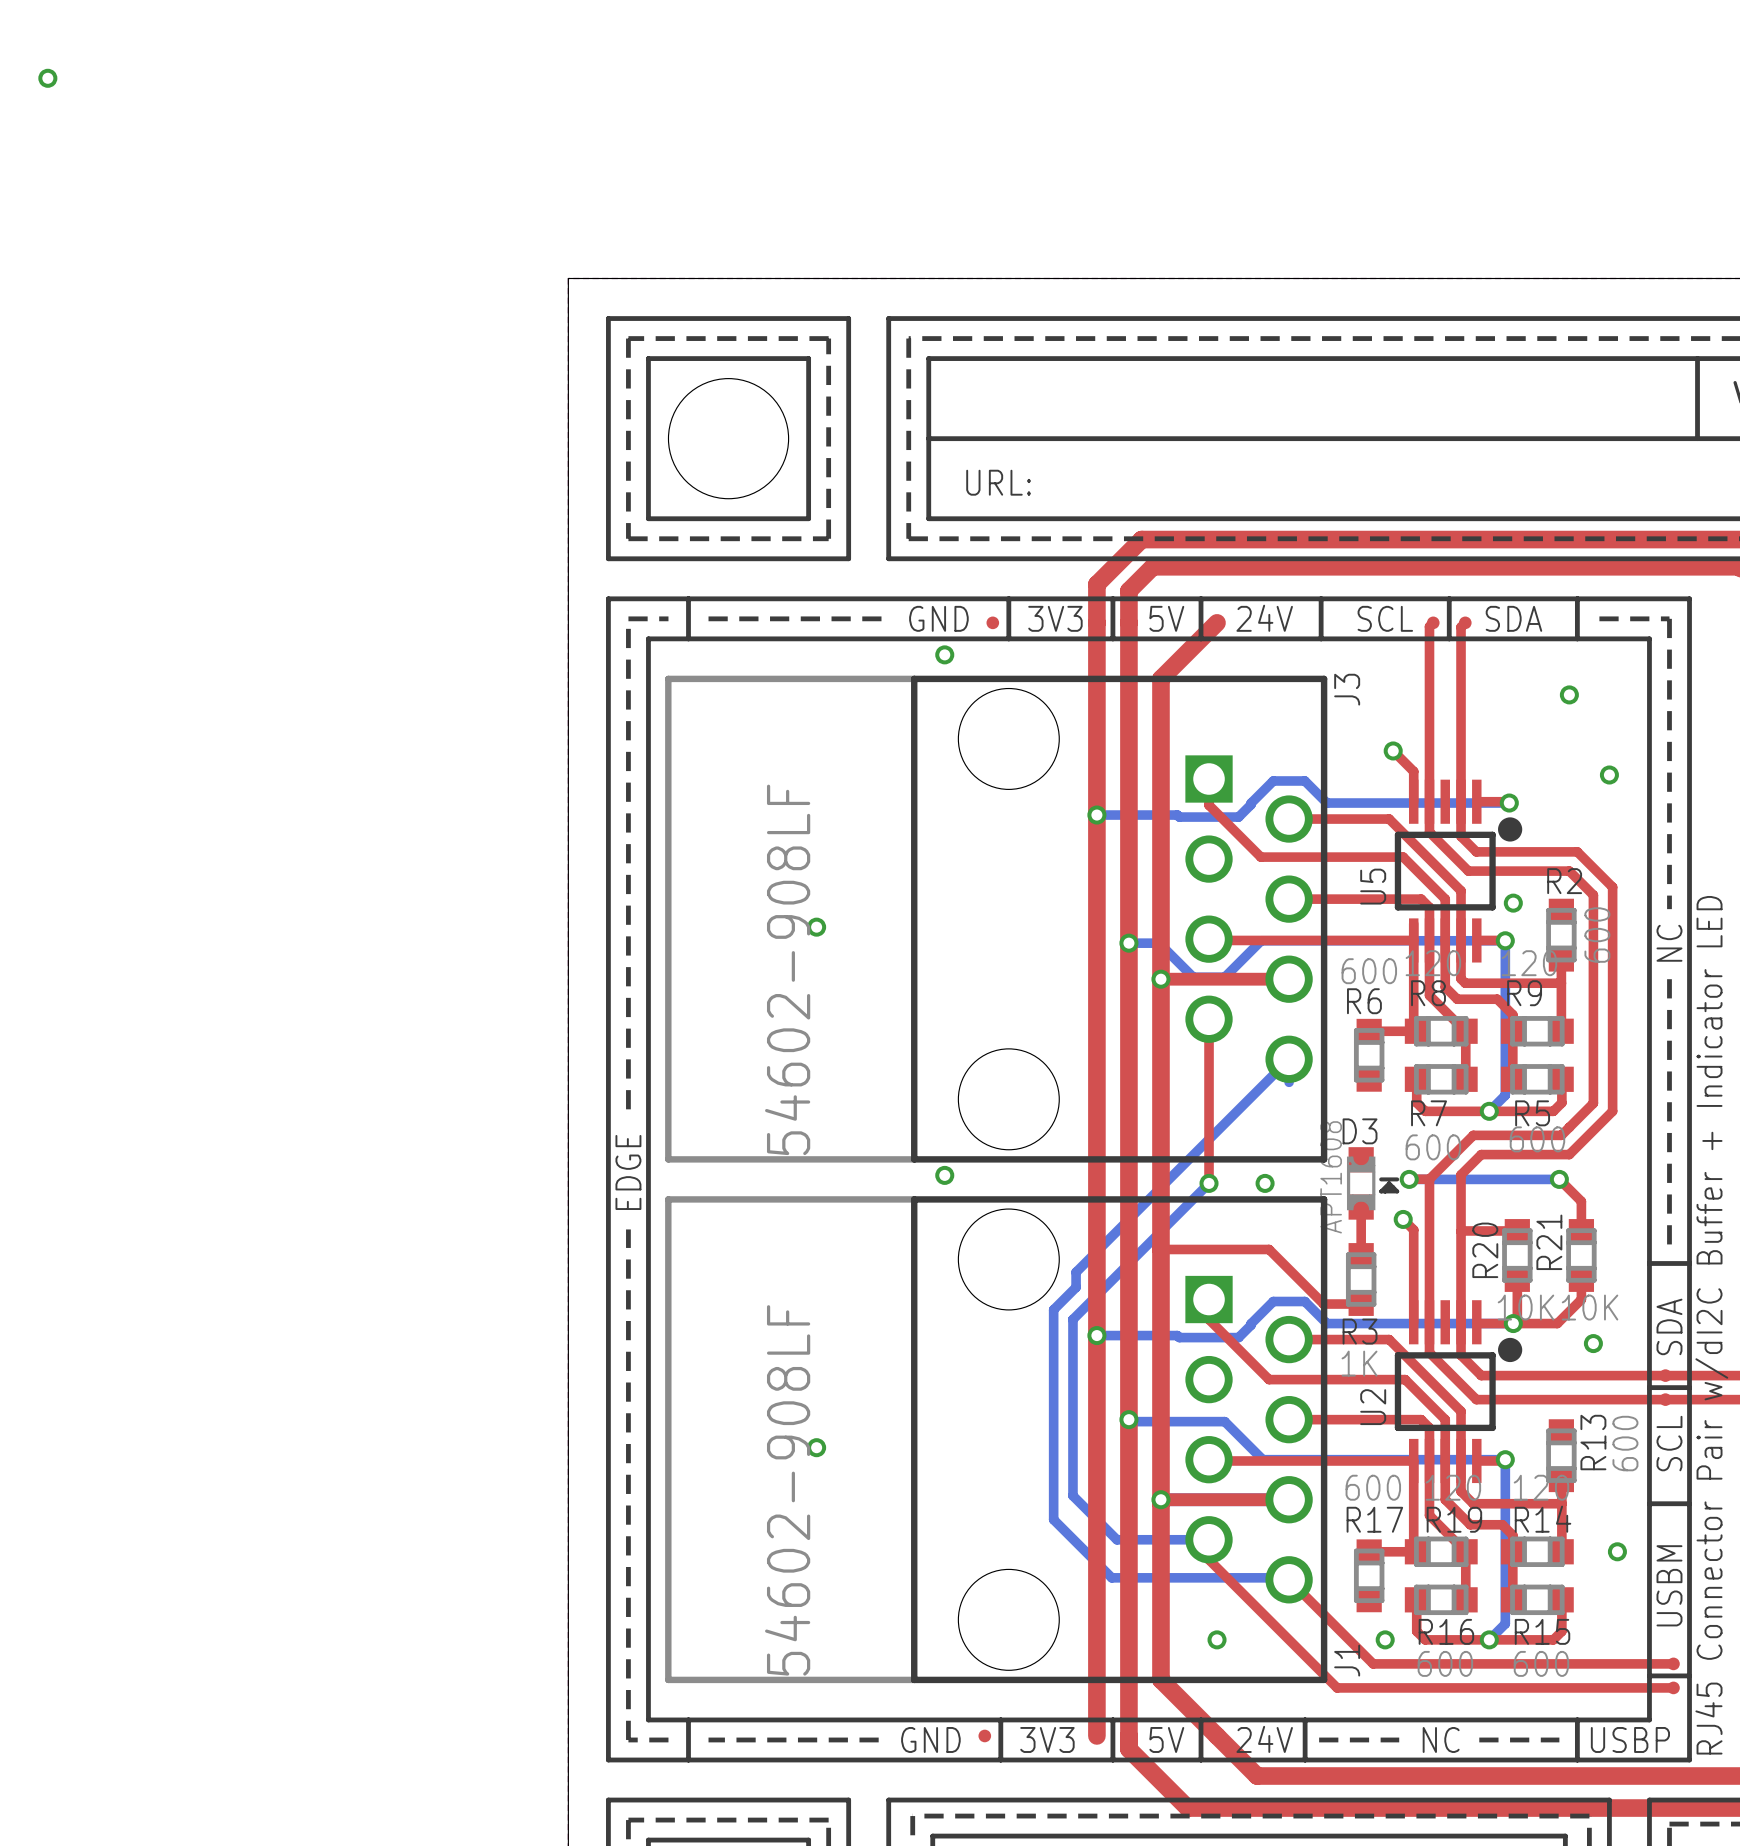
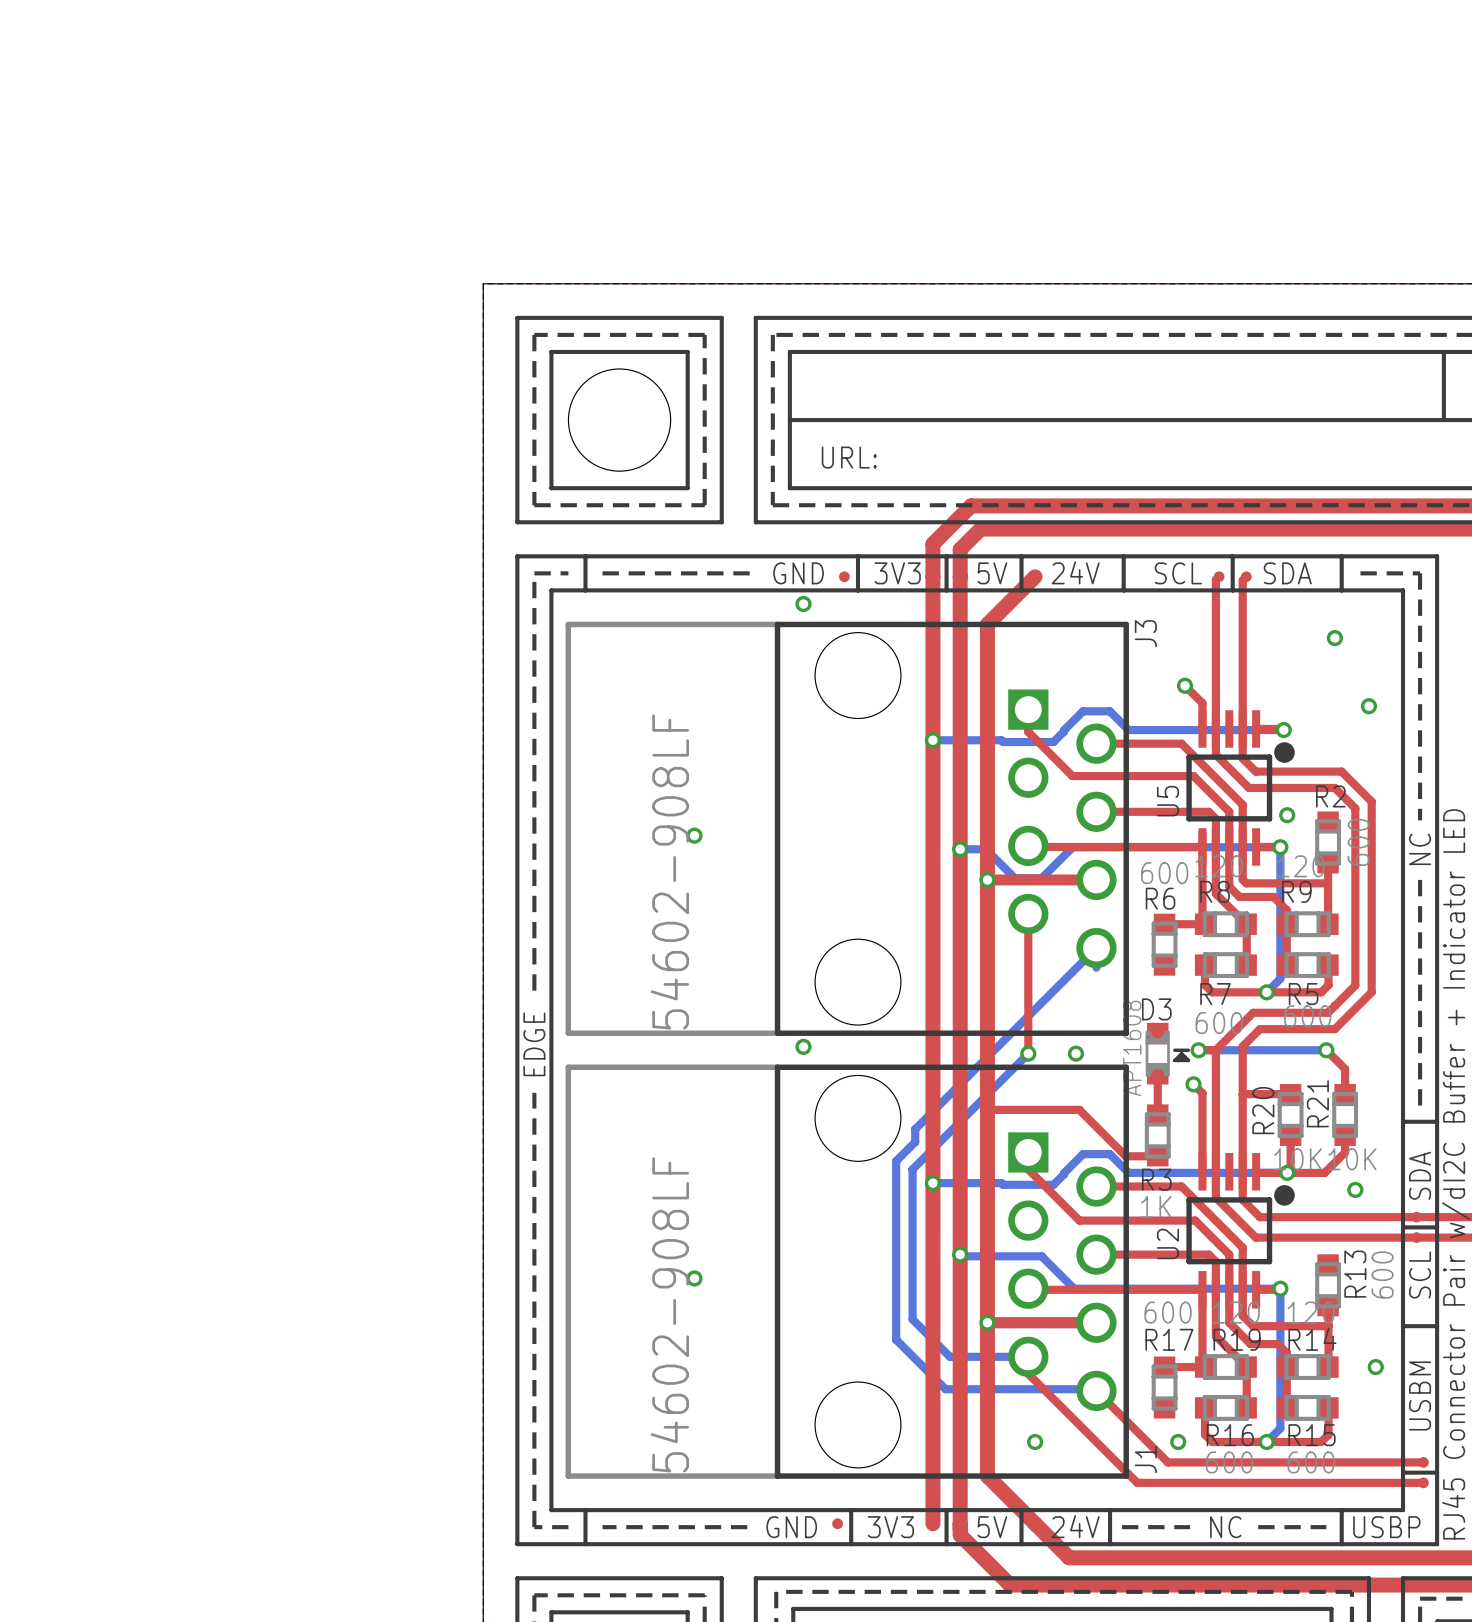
via: (47, 78) -> none

